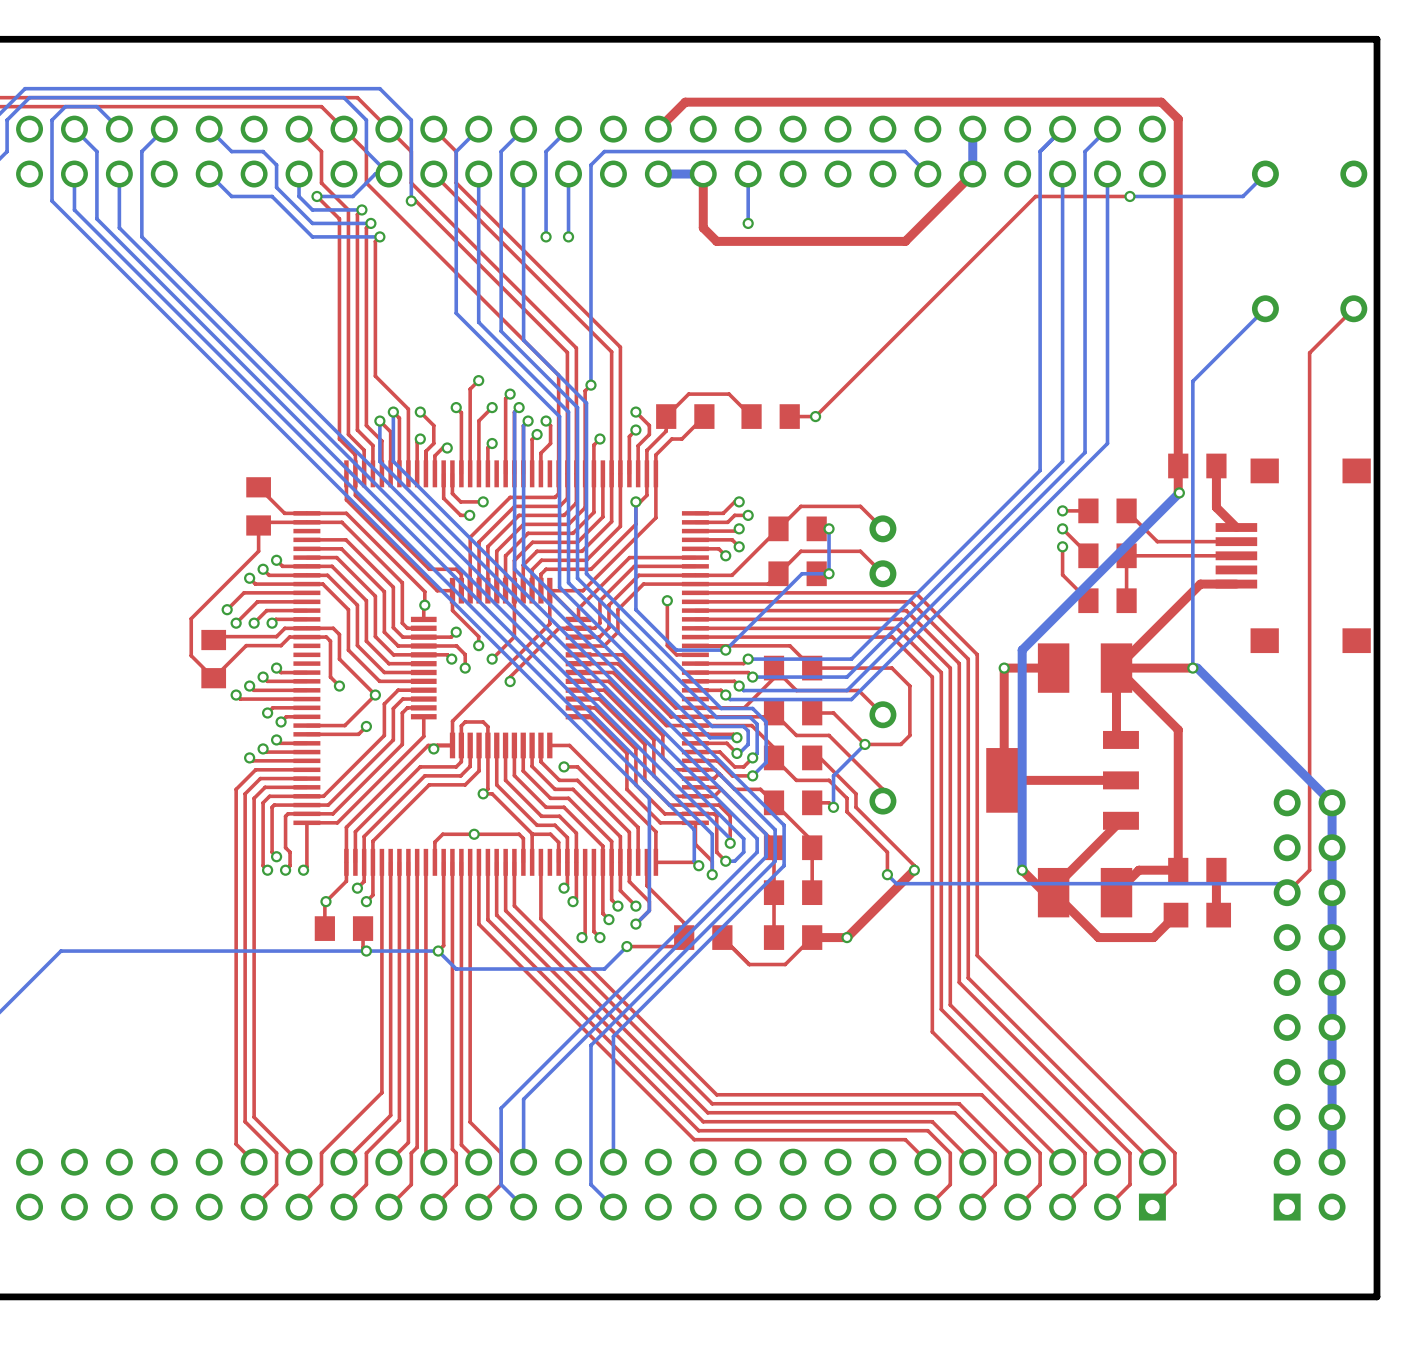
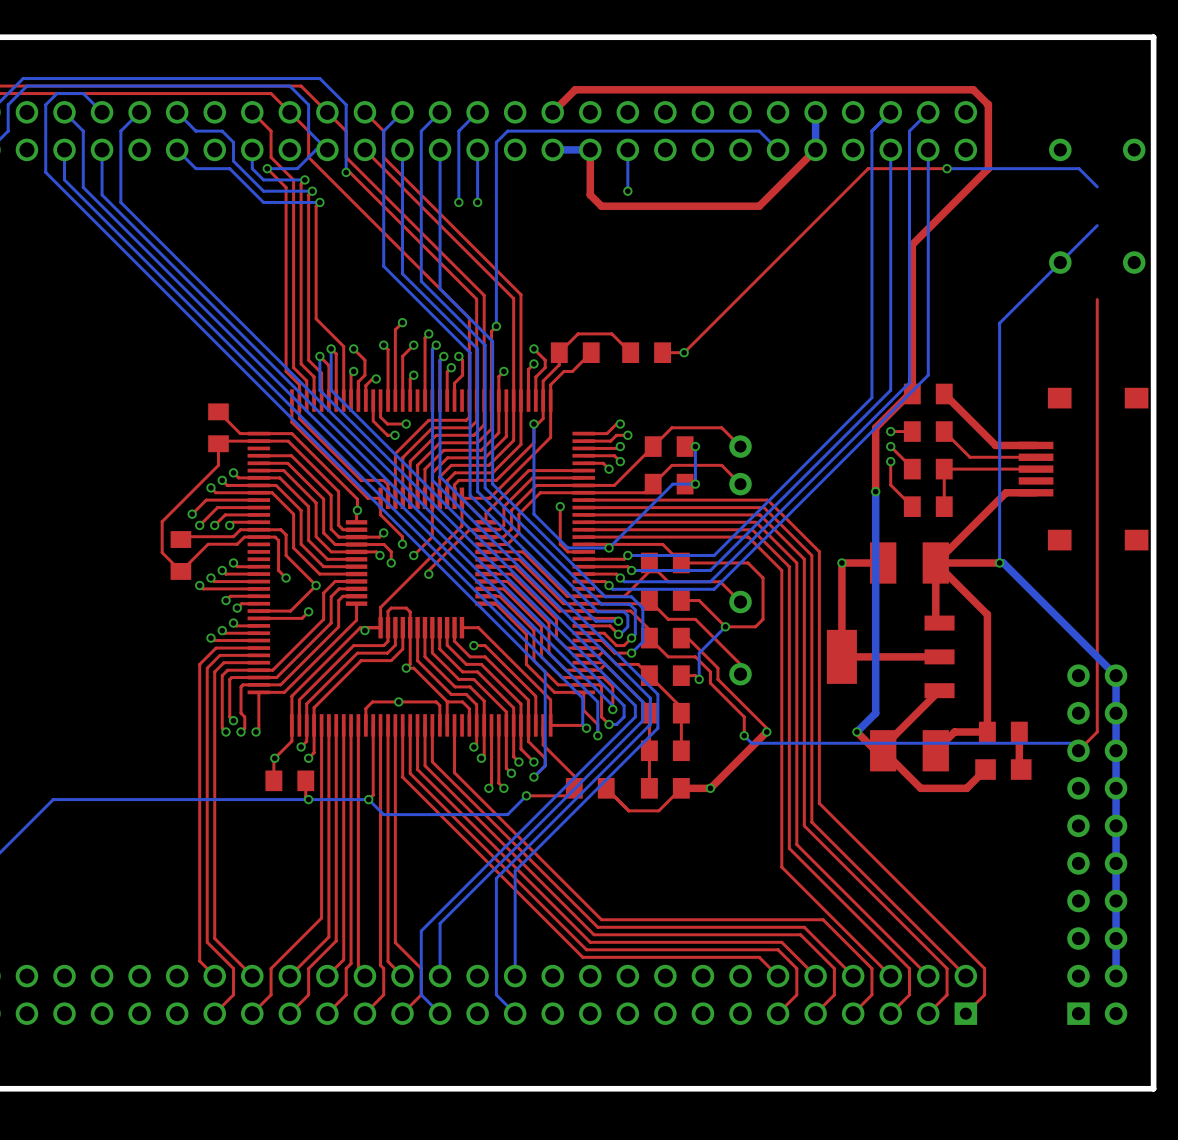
top track: (1178, 119) (1179, 492) -> (987, 103) (988, 168) (912, 244) (912, 393) (909, 393) (875, 427) (875, 491)
bottom track: (1265, 174) (1242, 196) -> (1097, 186) (1079, 168) (1041, 168)
bottom track: none -> (1097, 225) (1060, 262)
top track: (1353, 308) (1309, 352) -> none
part position: (1197, 465) -> (928, 393)
top track: (1216, 465) (1216, 507) (1236, 527) -> (944, 393) (995, 445) (1036, 445)
bottom track: (1179, 492) (1022, 650) (1022, 870) -> (875, 491) (875, 713) (856, 731)
via: (1179, 492) -> none
via: none -> (875, 491)

